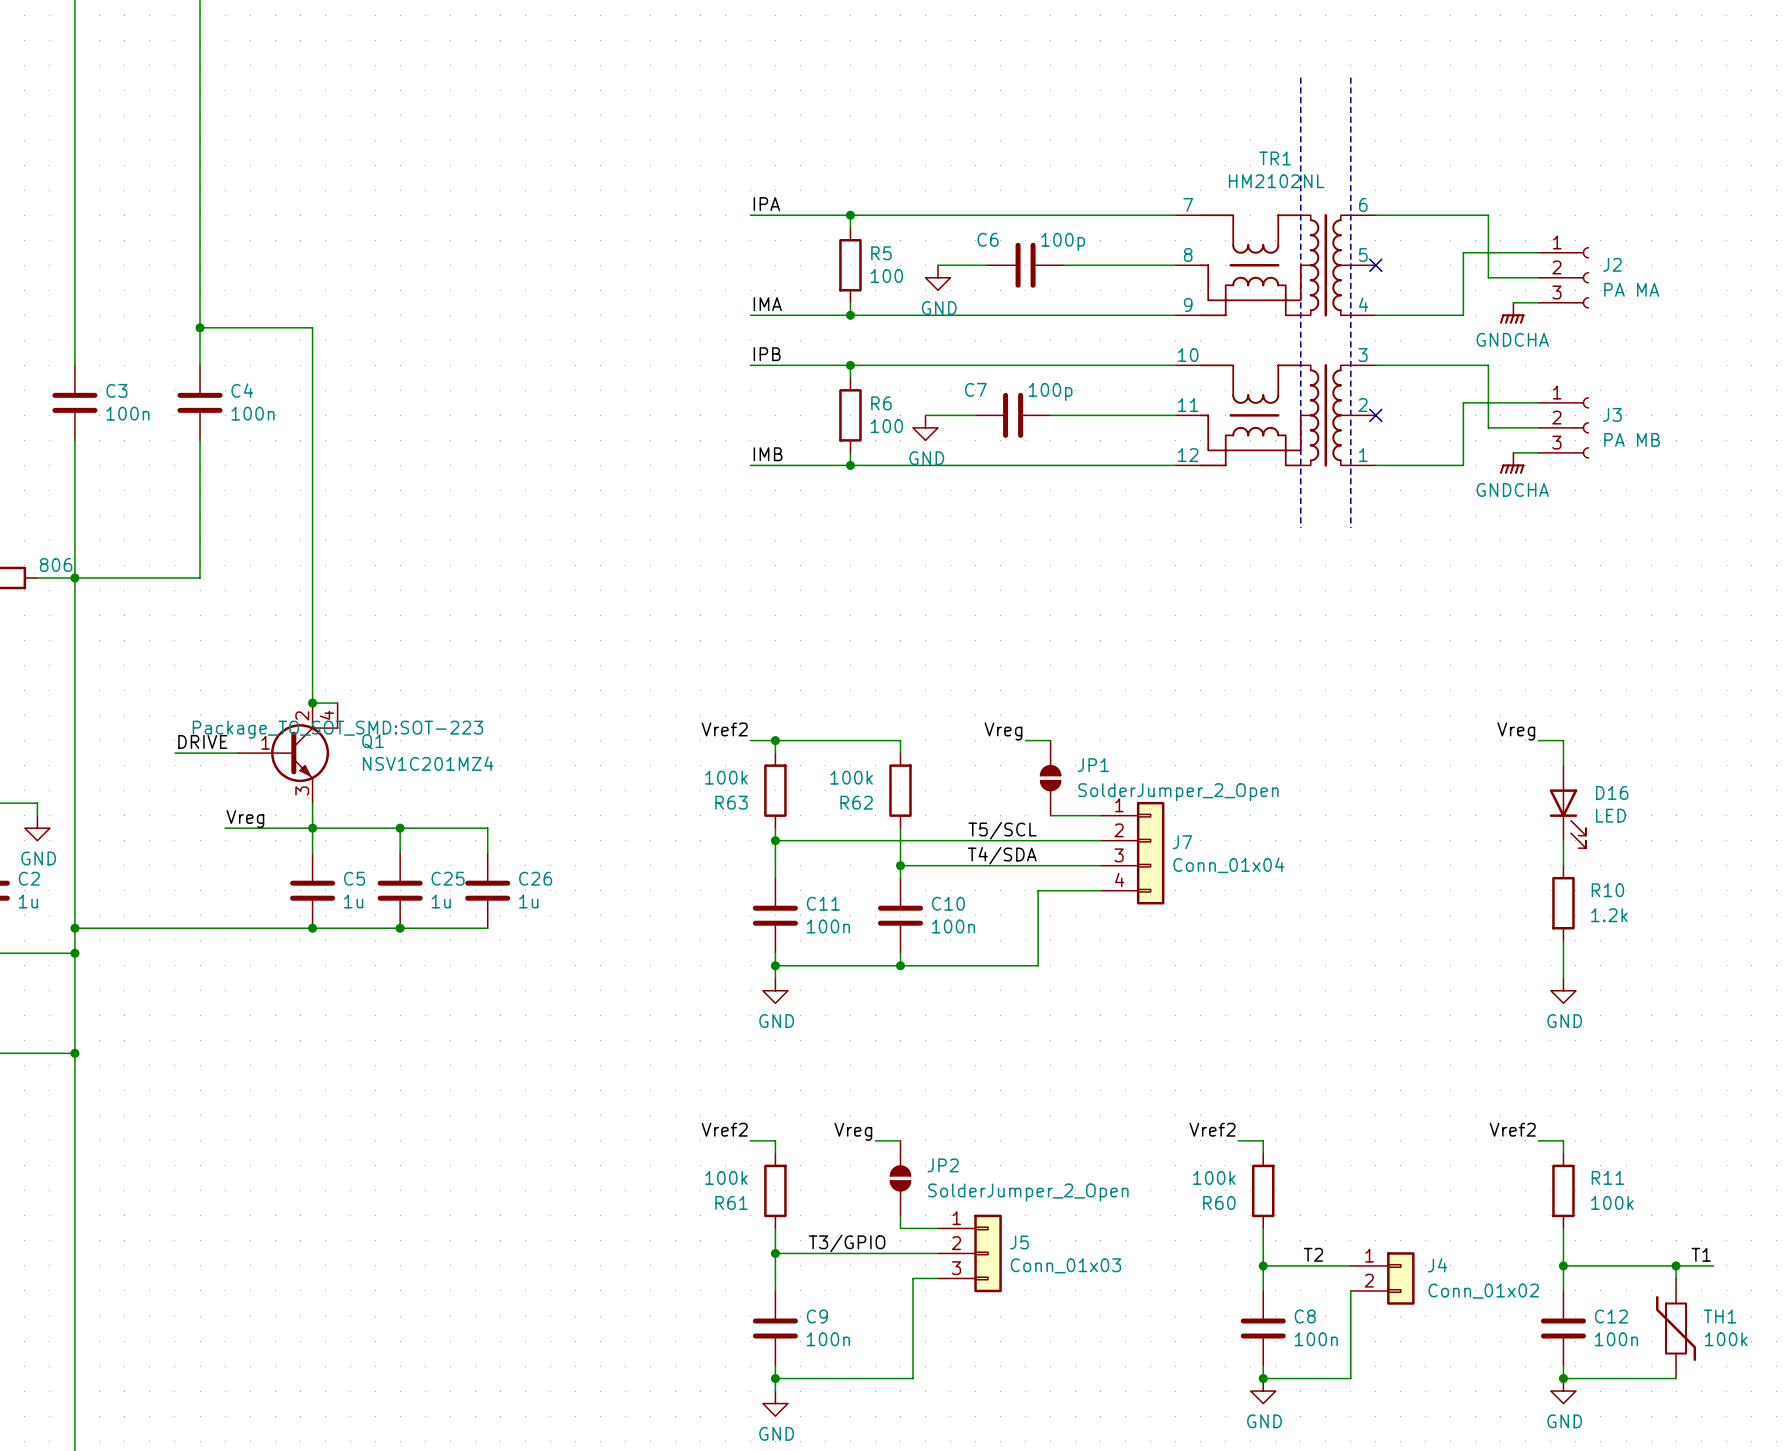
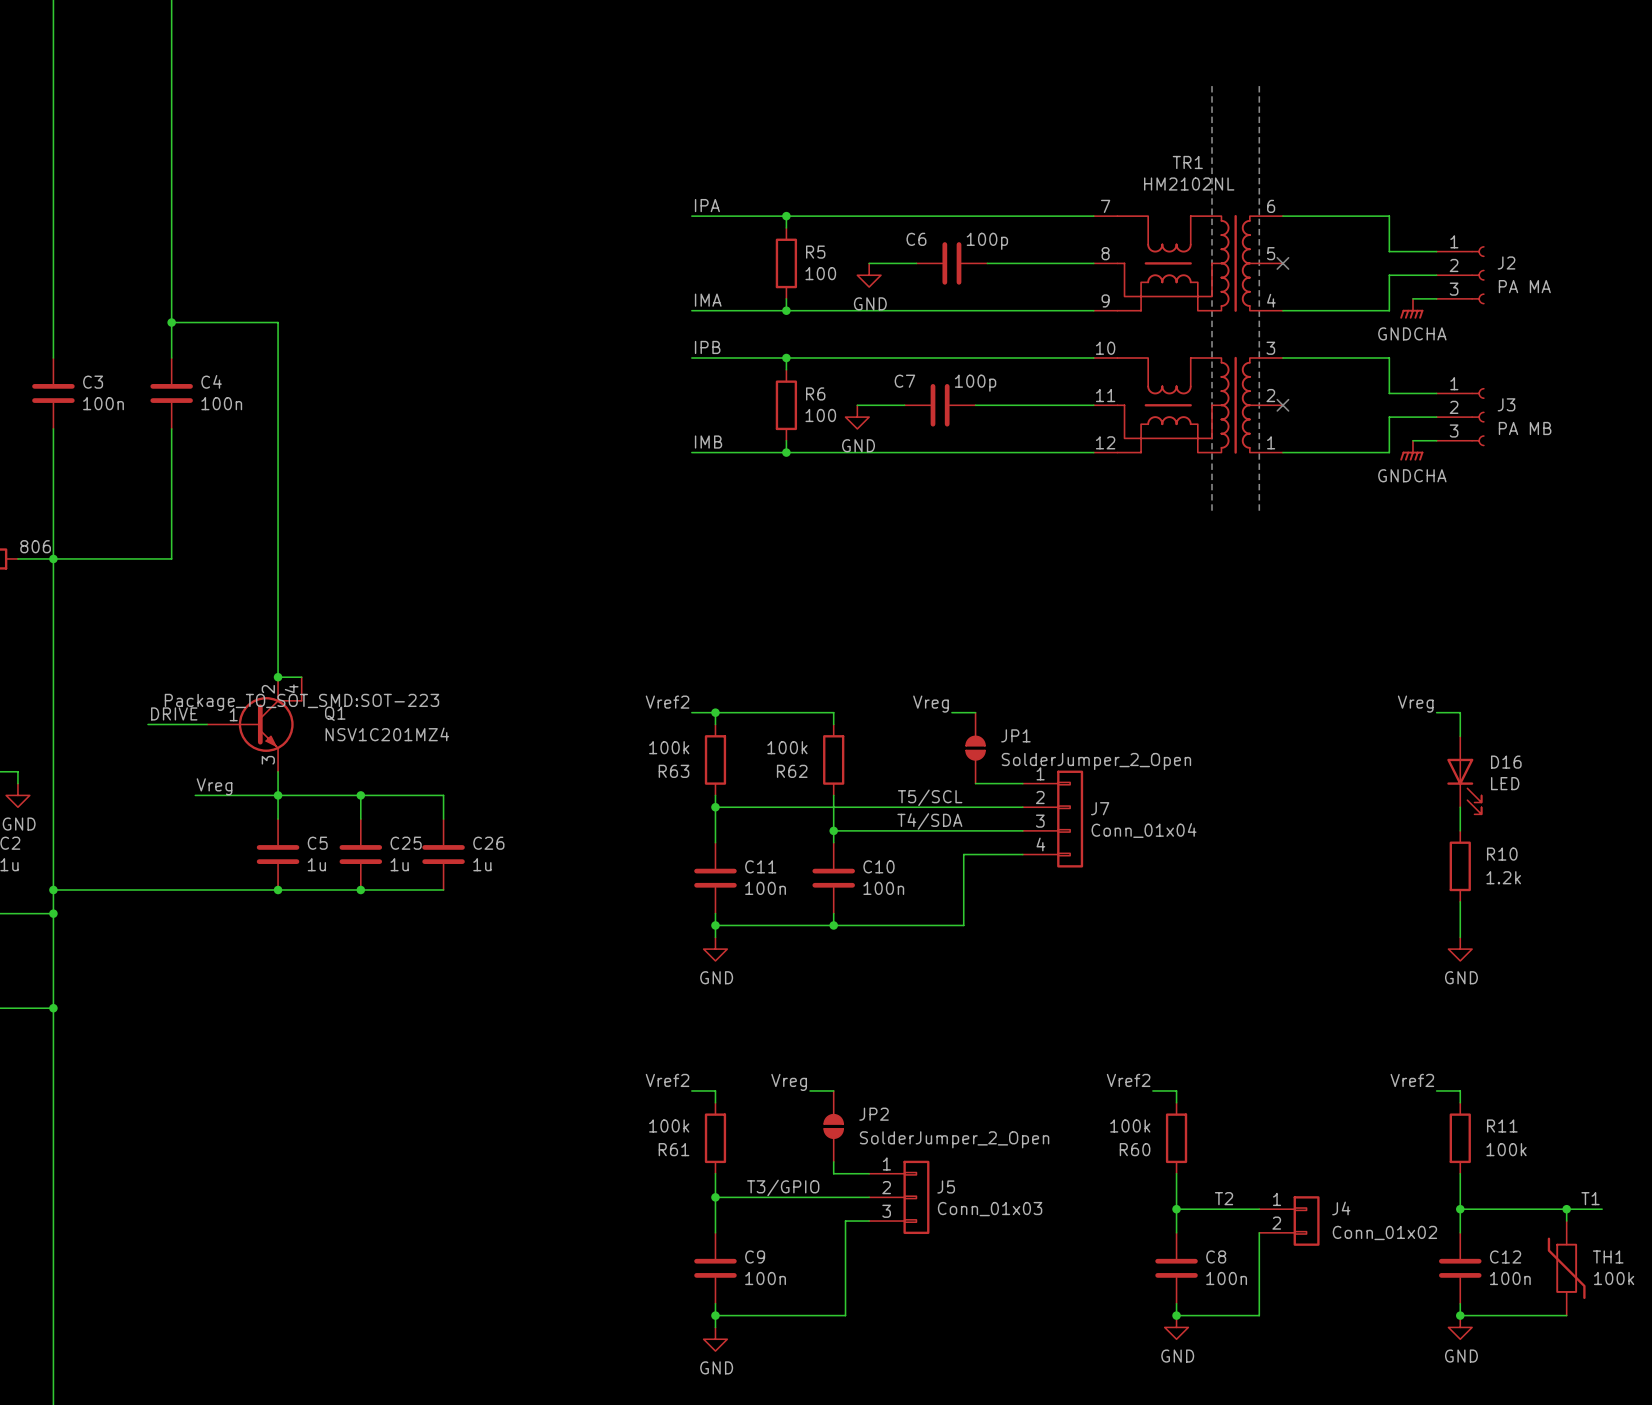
wire: (1488, 277) (1488, 252) (1463, 252) (1463, 315) -> (1389, 275) (1389, 310) (1365, 310)
wire: (1488, 427) (1488, 402) (1463, 402) (1463, 465) -> (1389, 417) (1389, 452) (1365, 452)

